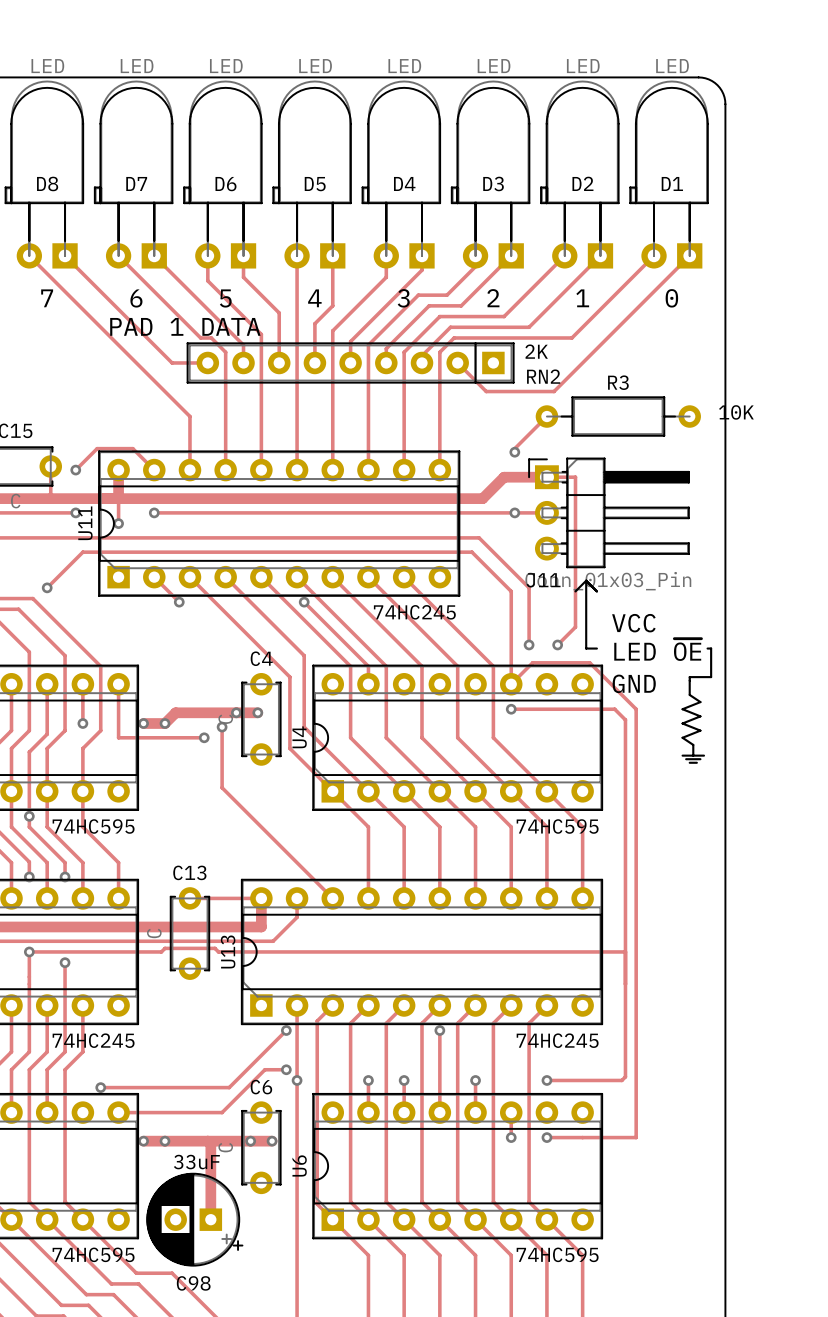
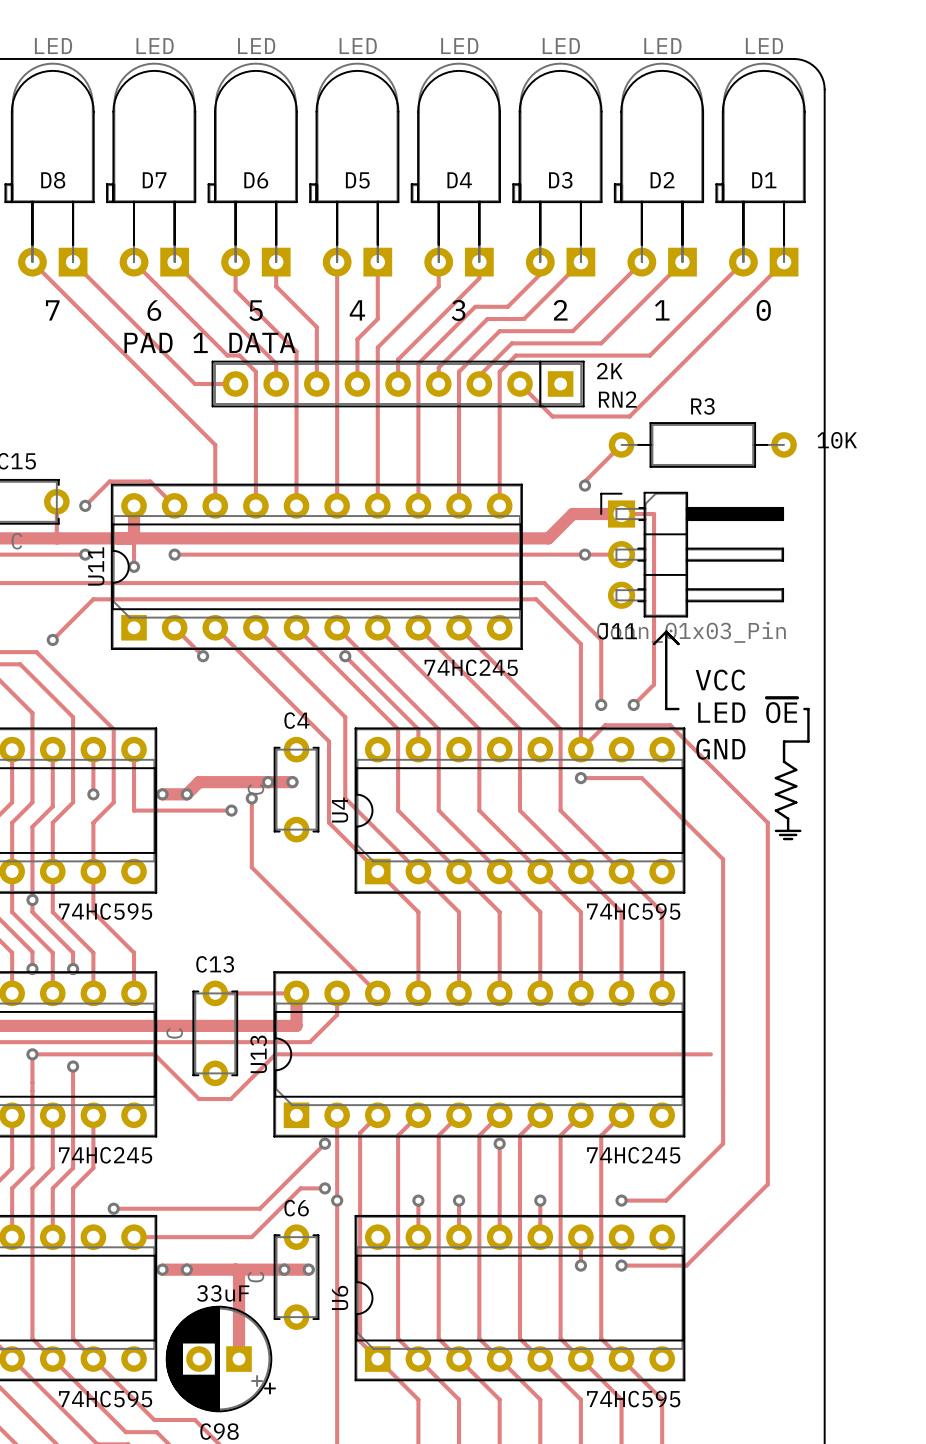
track: (564, 709) (614, 709) (625, 719) (625, 1076) (621, 1080) (586, 1080) -> none
track: (636, 709) (636, 780) -> (641, 778) (723, 859)
track: none -> (723, 778) (767, 822) (767, 1184) (686, 1265)
track: (136, 951) (161, 951) (164, 948) (214, 948) (218, 951) (242, 951) -> (154, 1054) (199, 1099) (230, 1099) (275, 1054)
track: (636, 1030) (636, 1137) (604, 1137) -> (723, 1143) (666, 1200)

